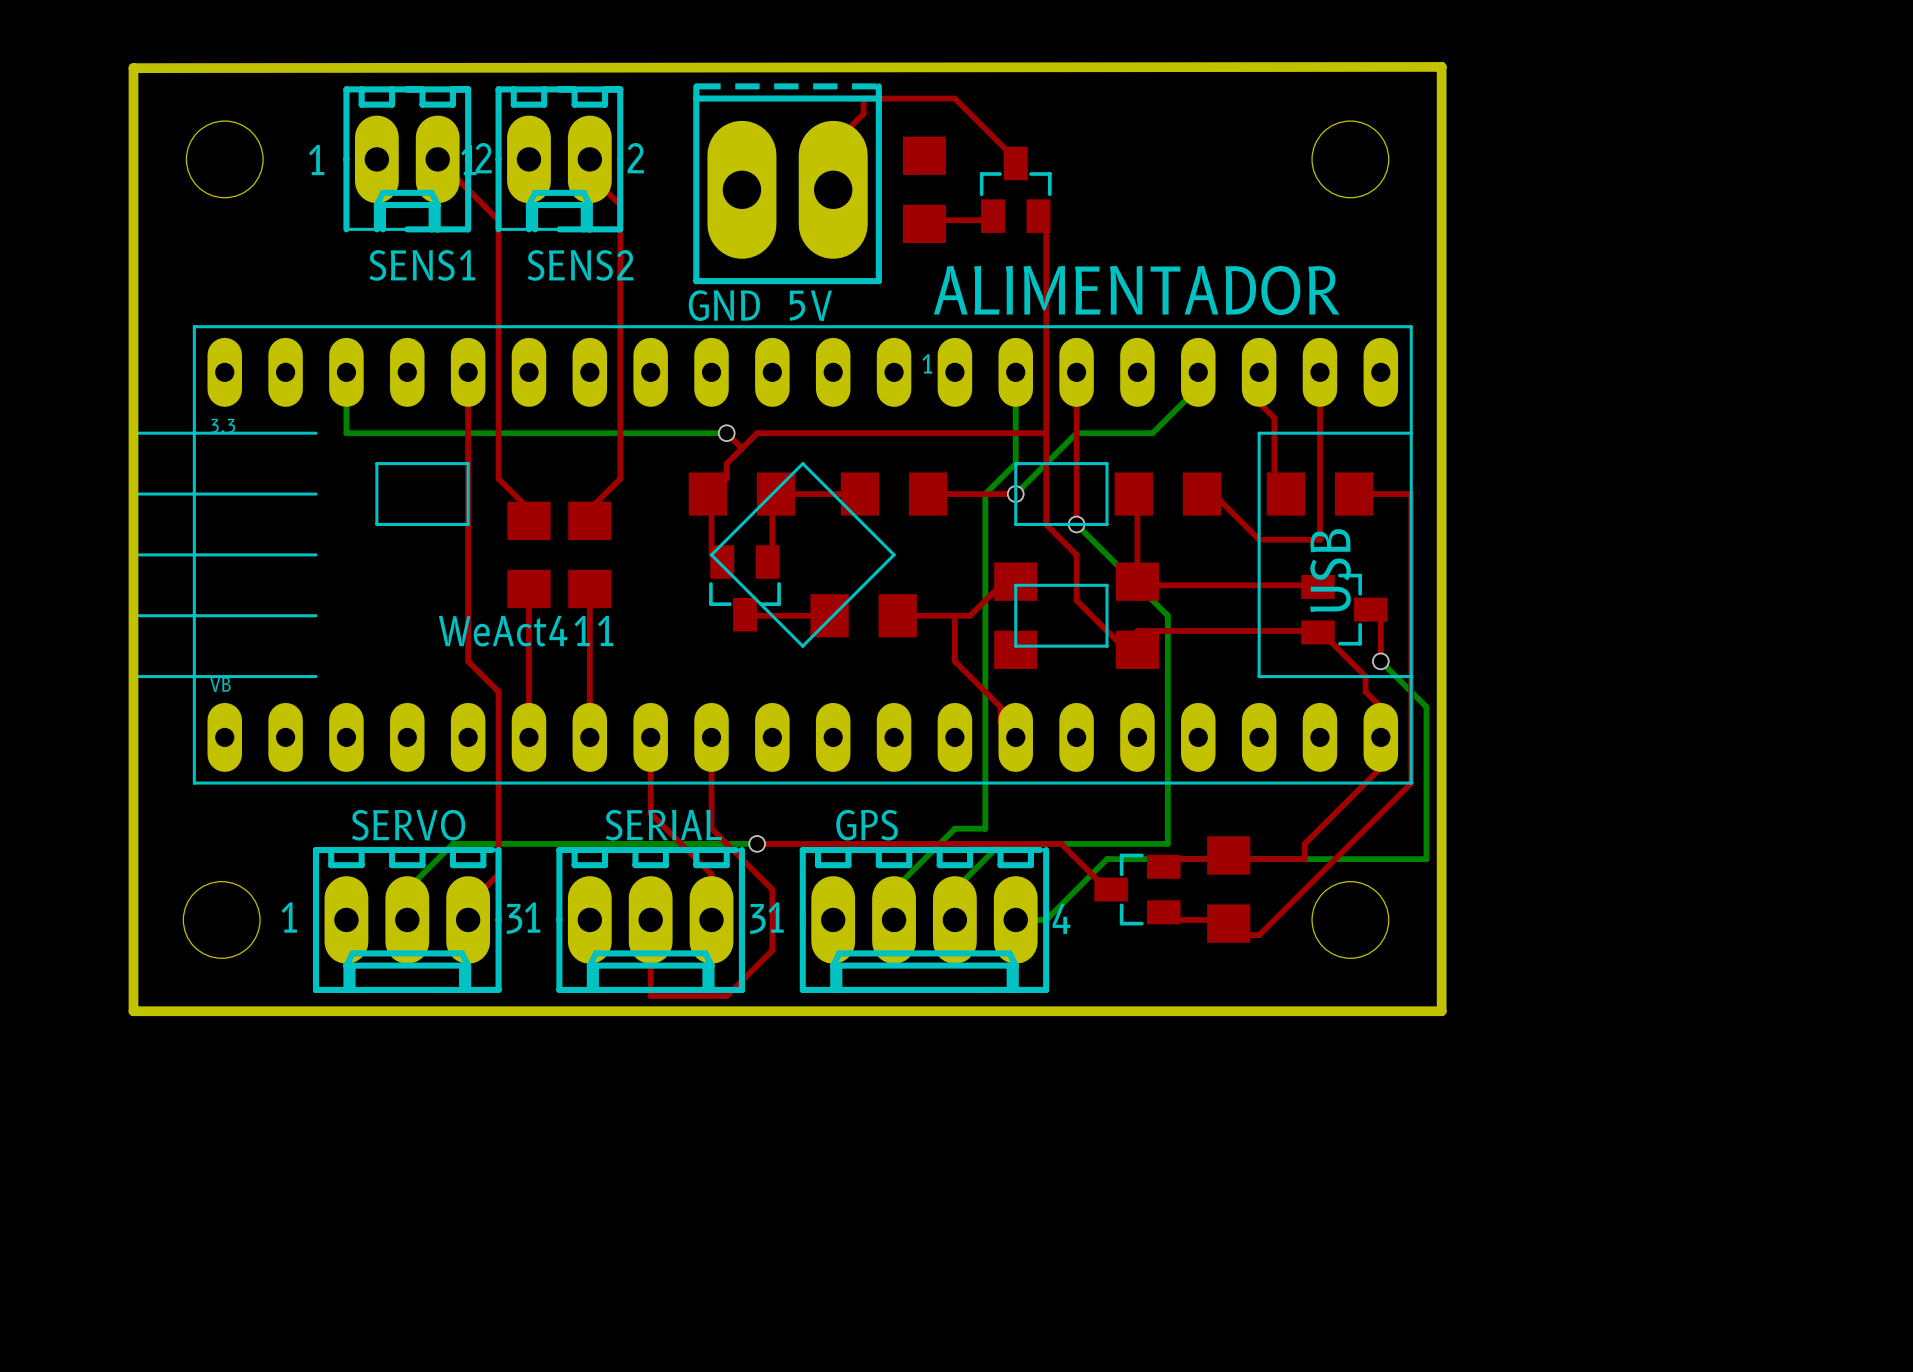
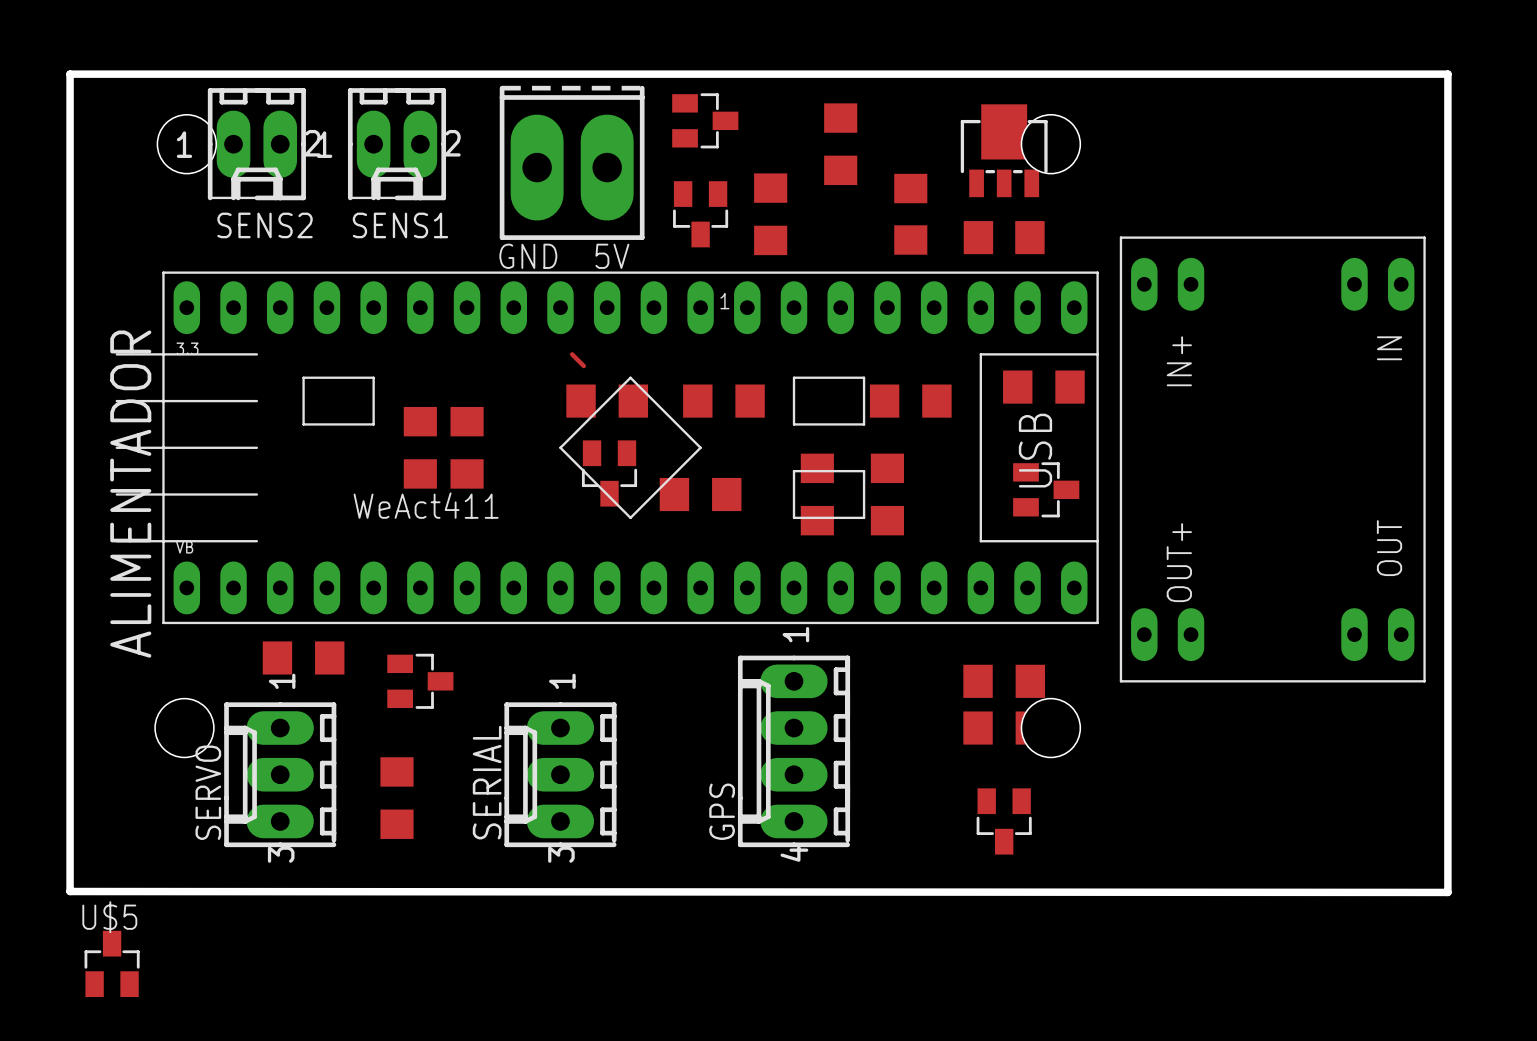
board edge: (1441, 66) (1441, 1011) (133, 1011) (133, 68) (1441, 66) -> (70, 74) (70, 891) (1447, 892) (1447, 74) (70, 74)
part: none -> (705, 120)
SENS1 position: (407, 159) -> (397, 144)
top track: (437, 159) (498, 220) (498, 478) (528, 509) (528, 520) -> none
SENS2 position: (559, 159) -> (256, 144)
top track: (589, 159) (589, 174) (620, 205) (620, 478) (589, 509) (589, 520) -> none
part: none -> (840, 144)
top track: (1015, 163) (1015, 159) (954, 98) (863, 98) (863, 113) (833, 144) (833, 189) -> none
part: none -> (1004, 150)
part position: (787, 183) -> (572, 162)
part: (924, 189) -> none
part: (1015, 189) -> none
top track: (992, 216) (985, 220) (924, 220) (924, 223) -> none
top track: (1038, 216) (1046, 220) (1046, 524) (1076, 554) (1076, 600) (1137, 661) (1137, 630) (1319, 630) (1365, 676) (1365, 691) (1380, 707) (1380, 767) (1304, 843) (1304, 859) (1167, 859) (1163, 866) -> none
part: none -> (700, 214)
part: none -> (770, 214)
part: none -> (910, 214)
part: none -> (1004, 237)
text: ALIMENTADOR (1136, 290) -> none
text position: GND 5V (760, 305) -> GND 5V (564, 256)
bottom track: (346, 372) (346, 433) (726, 433) -> none
top track: (468, 372) (468, 661) (498, 691) (498, 874) (468, 904) (468, 919) -> none
bottom track: (1015, 372) (1015, 463) (985, 494) (985, 828) (954, 828) (894, 889) (894, 919) -> none
top track: (1076, 372) (1076, 524) -> none
bottom track: (1198, 372) (1198, 387) (1152, 433) (1076, 433) (1015, 494) -> none
top track: (1259, 372) (1259, 402) (1274, 417) (1274, 494) (1285, 494) -> none
top track: (1319, 372) (1319, 539) (1259, 539) (1213, 494) (1201, 494) -> none
via: (726, 433) -> none
top track: (1046, 433) (757, 433) (726, 463) (726, 478) (711, 494) -> none
top track: (711, 494) (711, 554) (722, 562) -> none
part position: (741, 494) -> (607, 401)
top track: (859, 494) (772, 494) (772, 554) (767, 562) -> none
part position: (894, 494) -> (723, 401)
top track: (928, 494) (1015, 494) -> none
via: (1015, 494) -> none
top track: (1133, 494) (1137, 494) (1137, 585) (1317, 586) -> none
part position: (1319, 494) -> (1043, 387)
top track: (1354, 494) (1411, 494) (1411, 783) (1259, 935) (1228, 935) (1228, 919) (1167, 919) (1163, 912) -> none
bottom track: (1076, 524) (1167, 615) (1167, 843) (1000, 843) (954, 889) (954, 919) -> none
via: (1076, 524) -> none
part: none -> (1272, 459)
top track: (1015, 581) (1015, 570) (970, 615) (897, 615) -> none
top track: (528, 588) (528, 737) -> none
top track: (589, 588) (589, 737) -> none
part position: (744, 588) -> (609, 473)
top track: (1370, 609) (1380, 615) (1380, 661) -> none
top track: (744, 614) (741, 615) (829, 615) -> none
part position: (863, 615) -> (700, 494)
top track: (954, 615) (954, 661) (1000, 707) (1000, 722) (1015, 737) -> none
part position: (1015, 615) -> (817, 494)
text: none -> ALIMENTADOR (130, 494)
bottom track: (1380, 661) (1426, 707) (1426, 859) (1107, 859) (1046, 919) (1015, 919) -> none
via: (1380, 661) -> none
top track: (650, 737) (650, 813) (711, 874) (711, 919) -> none
top track: (711, 737) (711, 828) (772, 889) (772, 950) (726, 996) (650, 996) (650, 919) -> none
part: none -> (303, 657)
top track: (757, 843) (1061, 843) (1107, 889) (1111, 889) -> none
bottom track: (757, 843) (452, 843) (407, 889) (407, 919) -> none
via: (757, 843) -> none
part: none -> (420, 681)
part: none -> (1004, 681)
part rotation: 0° (1137, 889) -> 90° counterclockwise (1004, 821)
part position: (1137, 889) -> (1004, 821)
part: (1228, 889) -> none
SERVO: (407, 919) -> none
SERIAL: (650, 919) -> none
GPS: (924, 919) -> none
part: none -> (1004, 728)
GPS: none -> (794, 751)
SERVO: none -> (280, 774)
SERIAL: none -> (560, 774)
part: none -> (397, 798)
U$5: none -> (112, 963)

